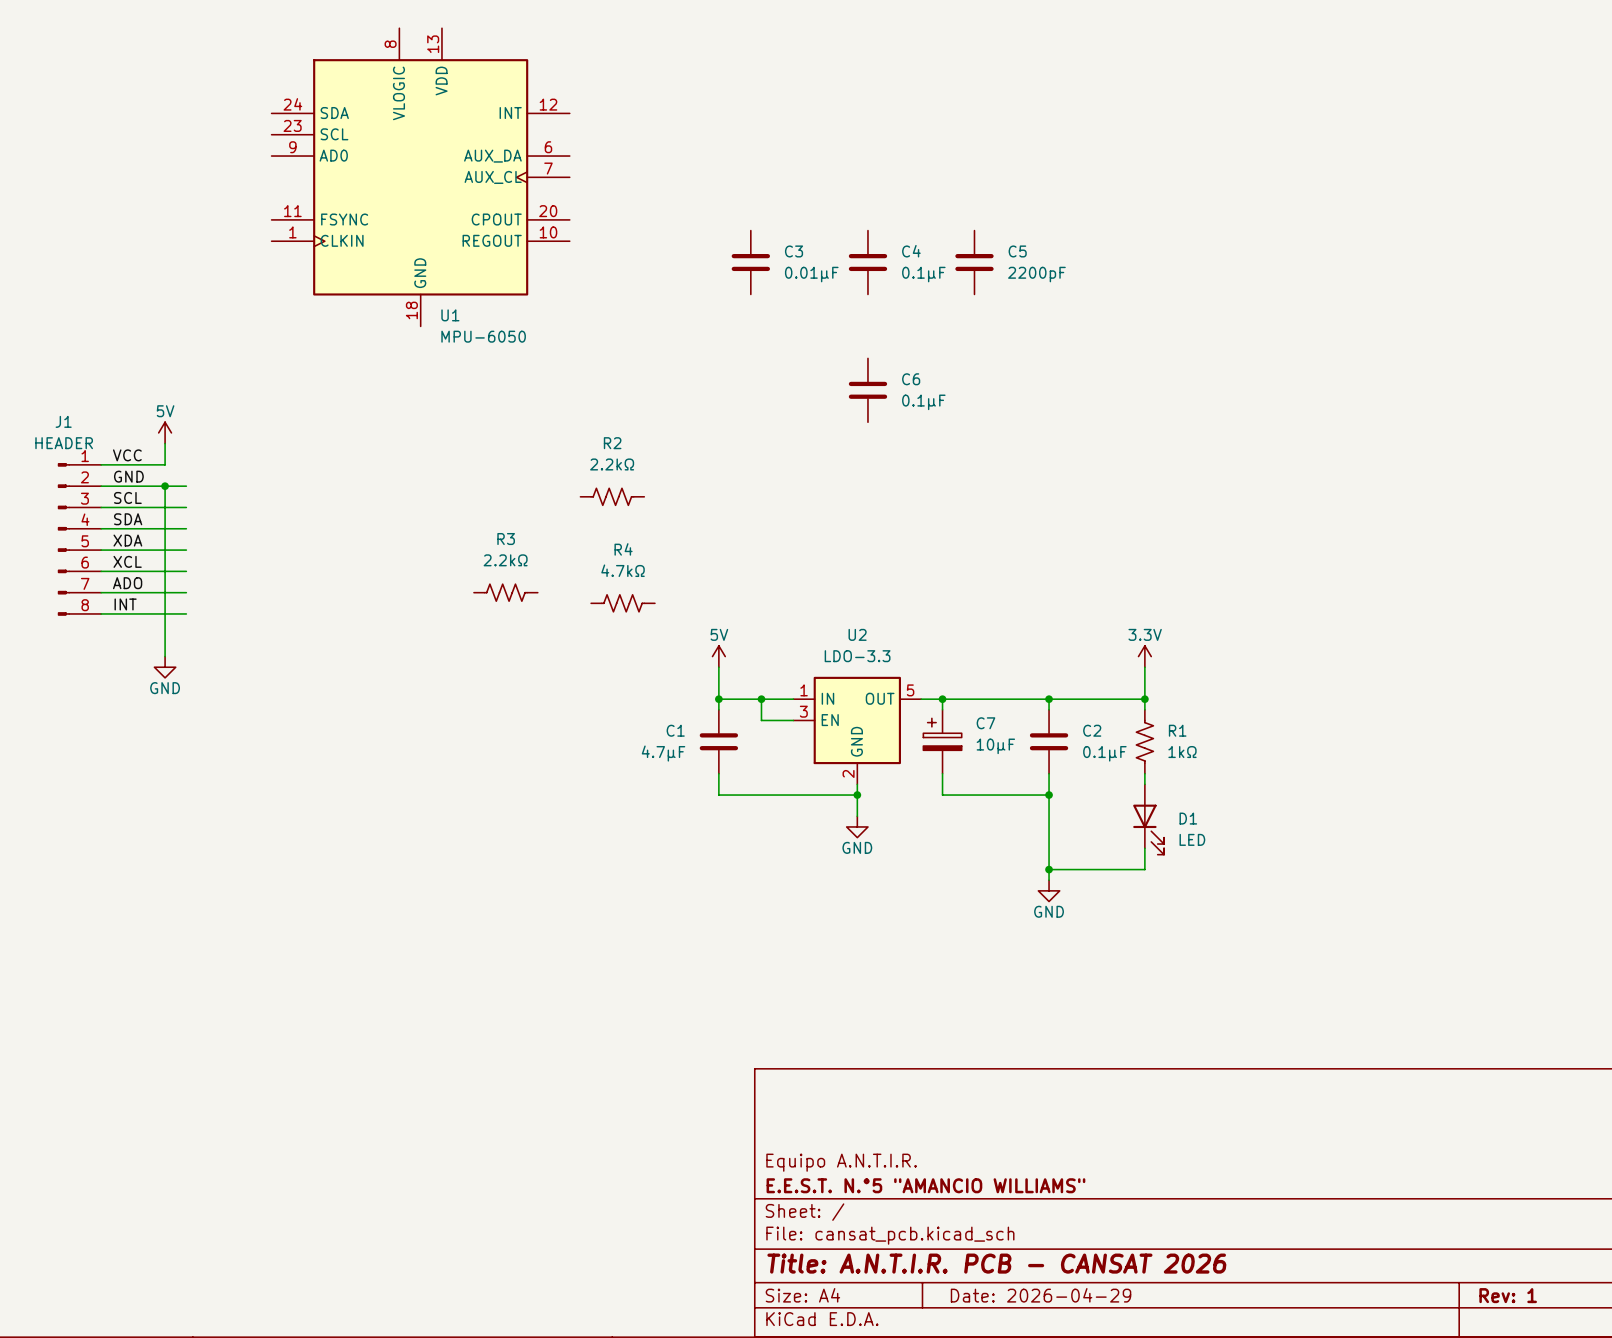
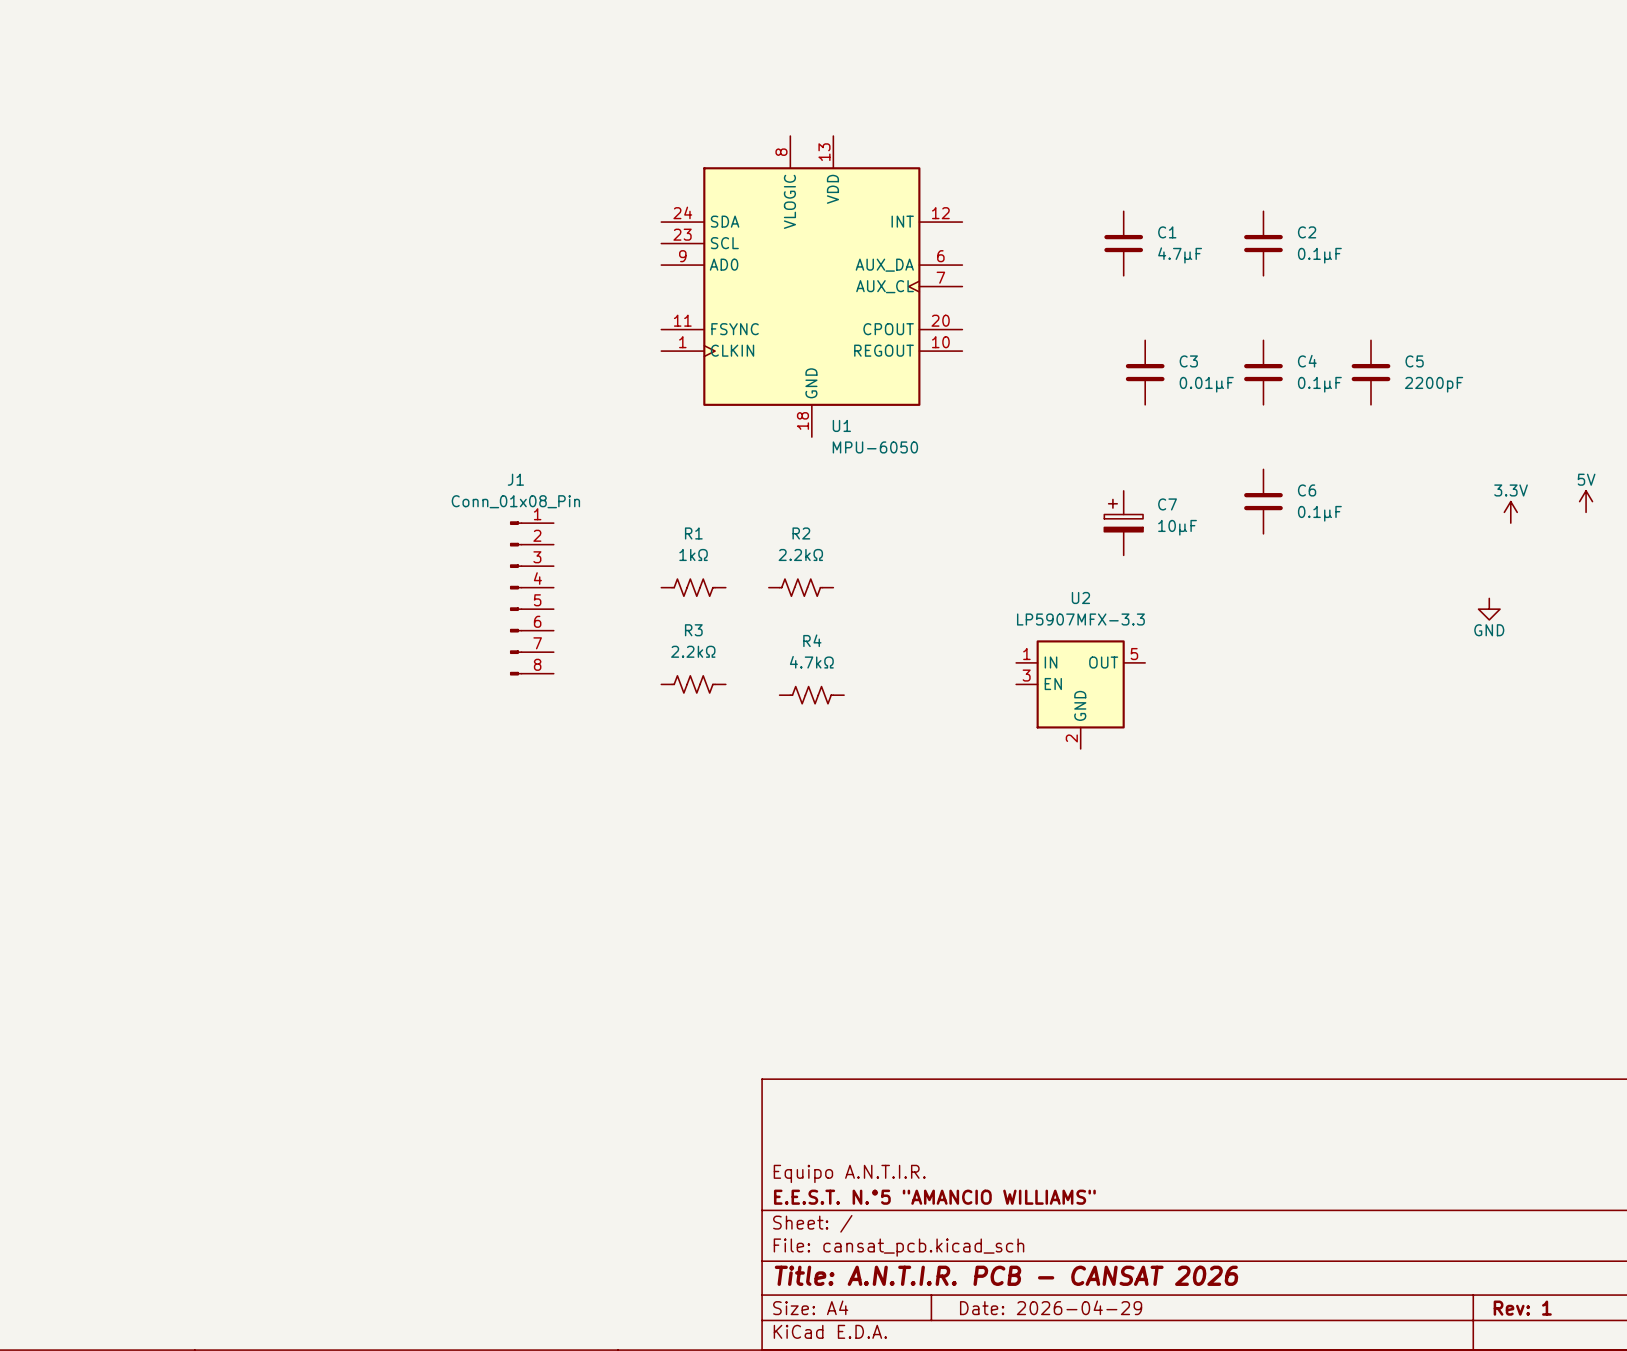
U1 position: (420, 177) -> (811, 286)
C3 position: (750, 262) -> (1145, 372)
C4 position: (867, 262) -> (1263, 372)
C5 position: (974, 262) -> (1371, 372)
C6 position: (867, 390) -> (1263, 501)
power symbol: 5V (165, 432) -> none
J1 value: HEADER (64, 443) -> Conn_01x08_Pin (515, 501)
wire: (165, 443) (165, 464) (101, 464) -> none
label: VCC (127, 455) -> none
label: GND (128, 476) -> none
wire: (101, 486) (186, 486) -> none
wire: (165, 486) (165, 656) -> none
junction: (165, 486) -> none
R2 position: (612, 496) -> (801, 587)
power symbol: none -> 5V (1586, 501)
label: SCL (127, 497) -> none
wire: (101, 507) (186, 507) -> none
power symbol: none -> 3.3V (1510, 512)
label: SDA (128, 519) -> none
wire: (101, 528) (186, 528) -> none
J1 position: (79, 539) -> (531, 598)
label: XDA (127, 540) -> none
wire: (101, 550) (186, 550) -> none
label: XCL (127, 561) -> none
wire: (101, 571) (186, 571) -> none
label: ADO (127, 583) -> none
wire: (101, 592) (186, 592) -> none
R3 position: (505, 592) -> (693, 684)
R4 position: (623, 603) -> (811, 695)
power symbol: none -> GND (1489, 609)
label: INT (125, 604) -> none
wire: (101, 613) (186, 613) -> none
power symbol: 5V (718, 656) -> none
U2 value: LDO-3.3 (857, 656) -> LP5907MFX-3.3 (1080, 619)
power symbol: 3.3V (1144, 656) -> none
power symbol: GND (165, 667) -> none
wire: (718, 667) (718, 709) -> none
wire: (1144, 667) (1144, 709) -> none
wire: (718, 699) (793, 699) -> none
junction: (718, 699) -> none
wire: (761, 699) (761, 720) (793, 720) -> none
junction: (761, 699) -> none
wire: (921, 699) (1144, 699) -> none
wire: (942, 699) (942, 709) -> none
junction: (942, 699) -> none
junction: (1049, 699) -> none
junction: (1144, 699) -> none
C1 name position: C1 (675, 730) -> C1 (1167, 232)
U2 position: (857, 730) -> (1080, 694)
R1 name position: R1 (1177, 730) -> R1 (693, 533)
C1 position: (718, 741) -> (1123, 243)
C7 position: (942, 741) -> (1123, 523)
C2 position: (1049, 741) -> (1263, 243)
R1 rotation: 0° (1144, 741) -> 90° clockwise (693, 587)
R1 position: (1144, 741) -> (693, 587)
R1 value position: 1kΩ (1182, 752) -> 1kΩ (693, 554)
C1 value position: 4.7µF (663, 753) -> 4.7µF (1180, 255)
wire: (718, 773) (718, 795) (857, 795) -> none
wire: (942, 773) (942, 795) (1049, 795) -> none
wire: (1049, 773) (1049, 880) -> none
wire: (1144, 773) (1144, 784) -> none
wire: (857, 784) (857, 816) -> none
junction: (857, 795) -> none
junction: (1049, 795) -> none
D1: LED (1148, 819) -> none
power symbol: GND (857, 826) -> none
wire: (1144, 848) (1144, 869) (1049, 869) -> none
junction: (1049, 869) -> none
power symbol: GND (1049, 890) -> none

